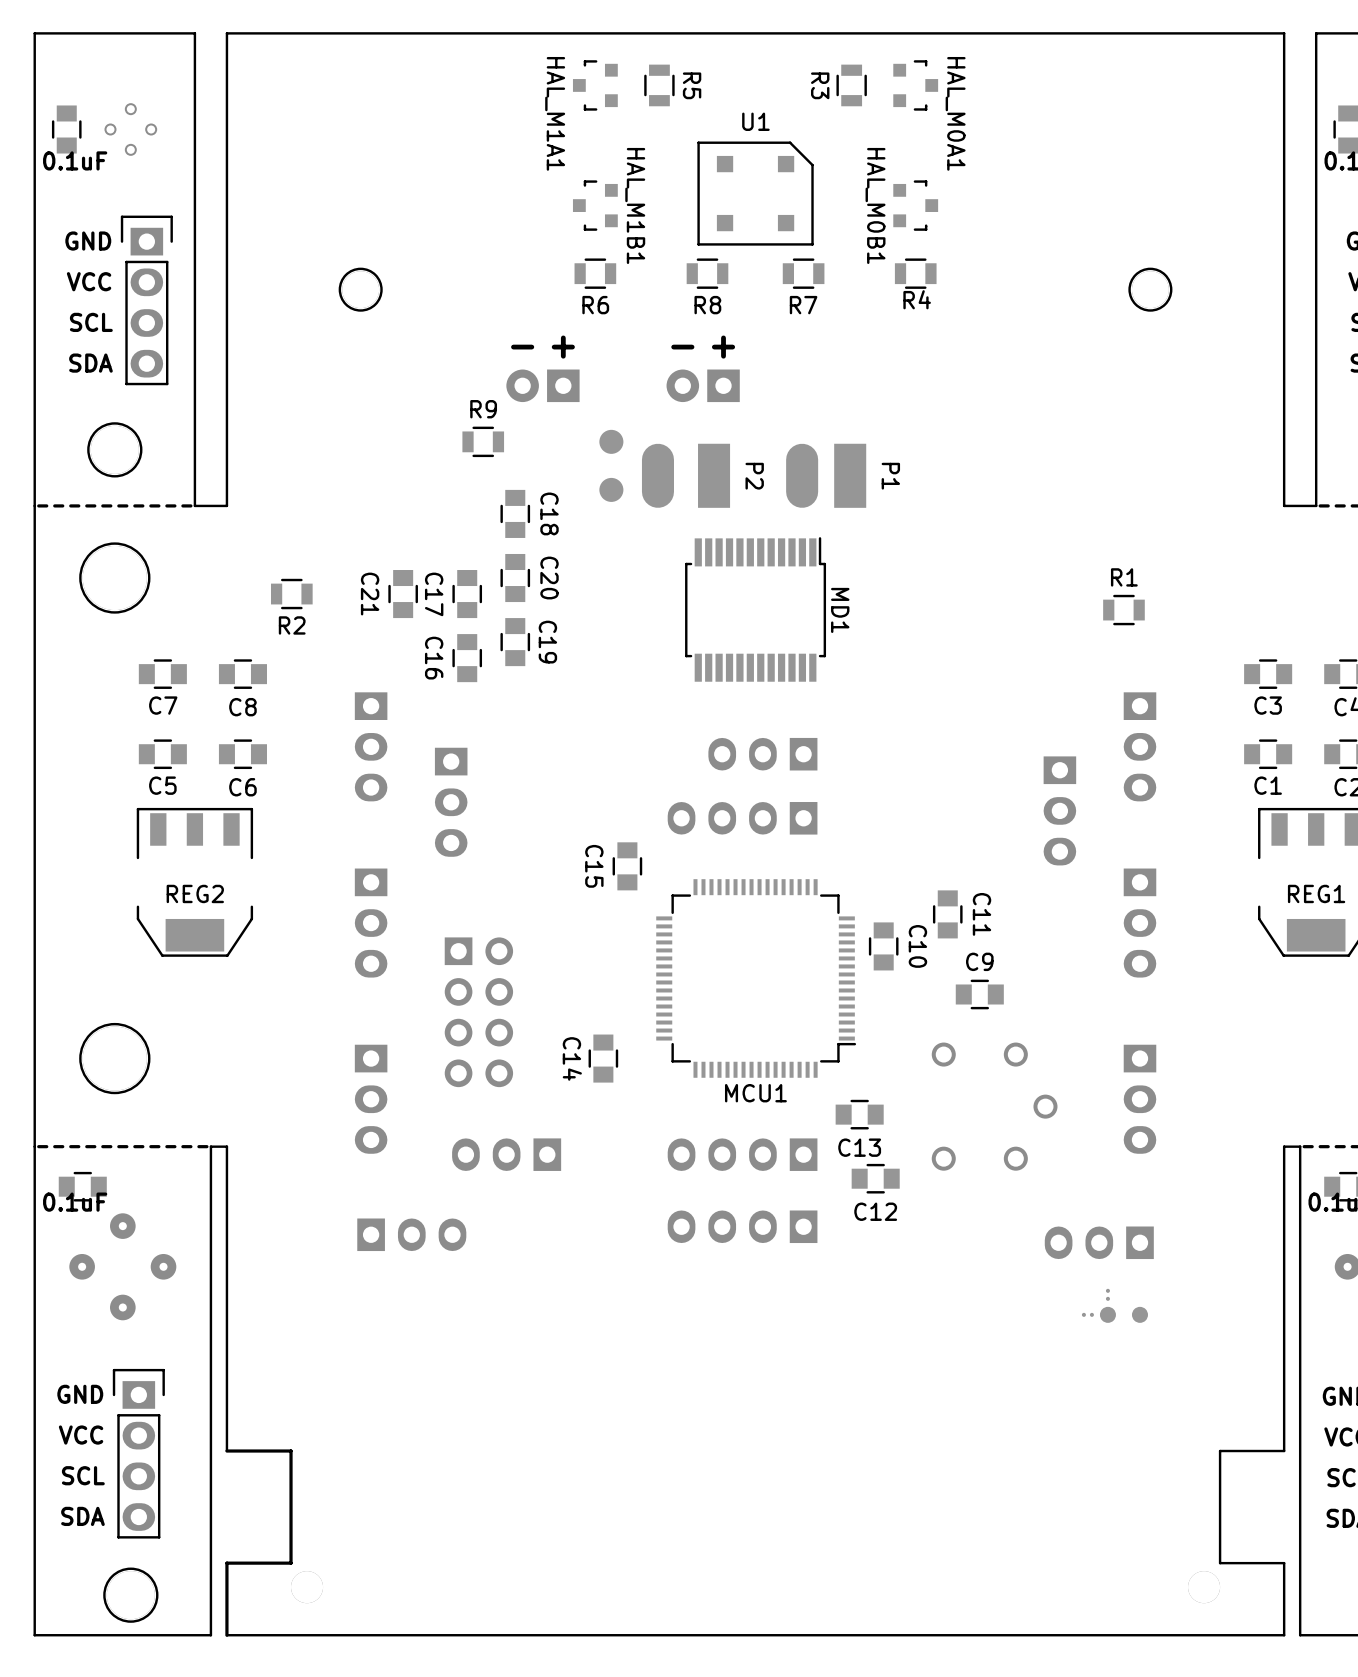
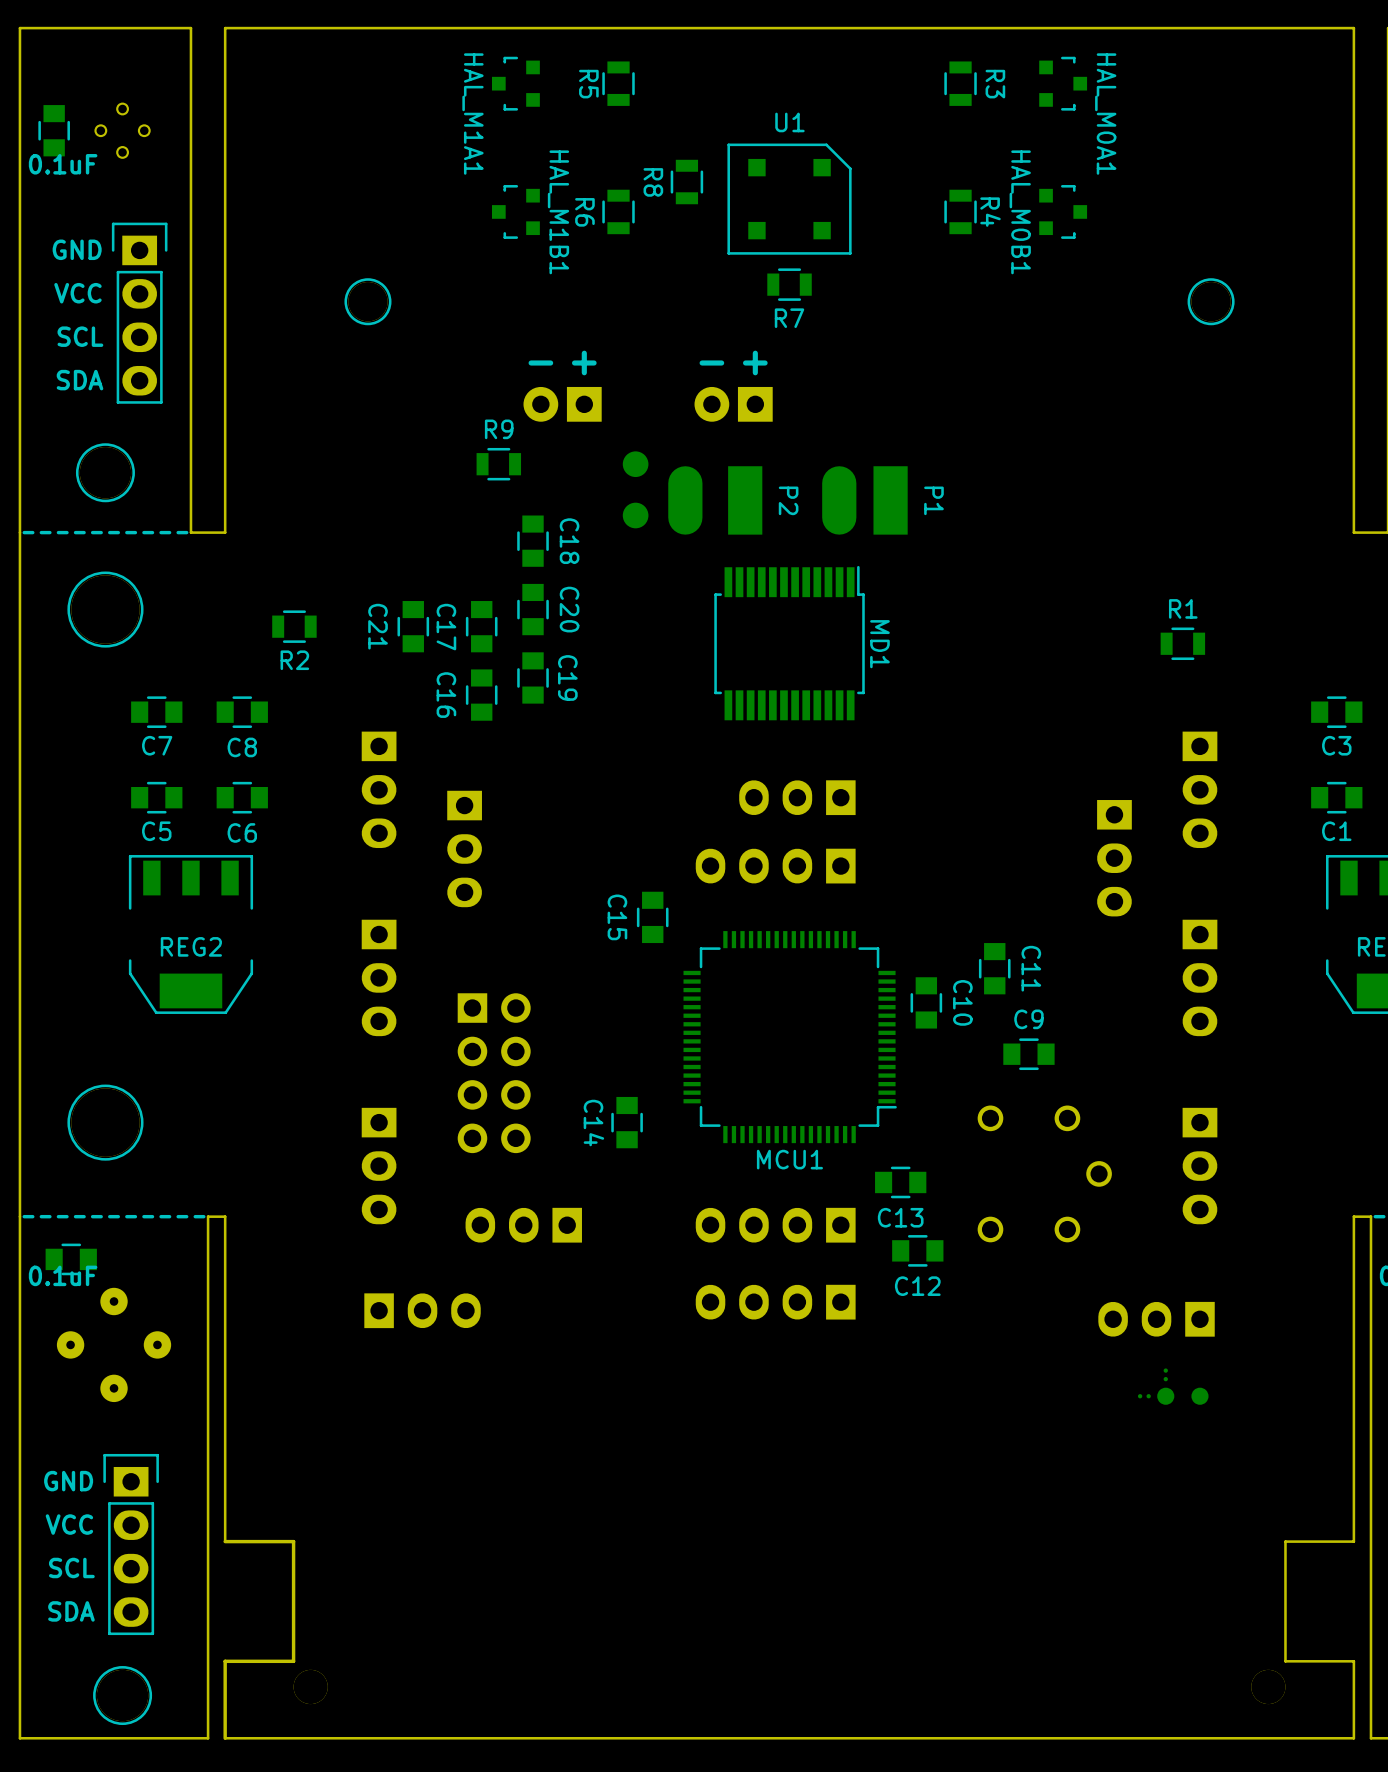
HAL_M1A1 position: (595, 85) -> (515, 83)
R5 position: (659, 85) -> (618, 83)
R5 name position: R5 (692, 85) -> R5 (588, 84)
R3 name position: R3 (820, 85) -> R3 (995, 84)
R3 position: (851, 85) -> (960, 83)
HAL_M0A1 position: (915, 85) -> (1063, 83)
HAL_M1B1 position: (595, 205) -> (515, 211)
HAL_M0B1 position: (915, 205) -> (1063, 211)
R6 rotation: 0° (595, 273) -> 90° clockwise (618, 211)
R6 position: (595, 273) -> (618, 211)
R8 rotation: 0° (707, 273) -> 90° clockwise (686, 182)
R8 position: (707, 273) -> (686, 182)
R7 position: (803, 273) -> (789, 284)
R4 rotation: 0° (915, 273) -> 90° clockwise (960, 211)
R4 position: (915, 273) -> (960, 211)
R4 name position: R4 (917, 299) -> R4 (990, 212)

